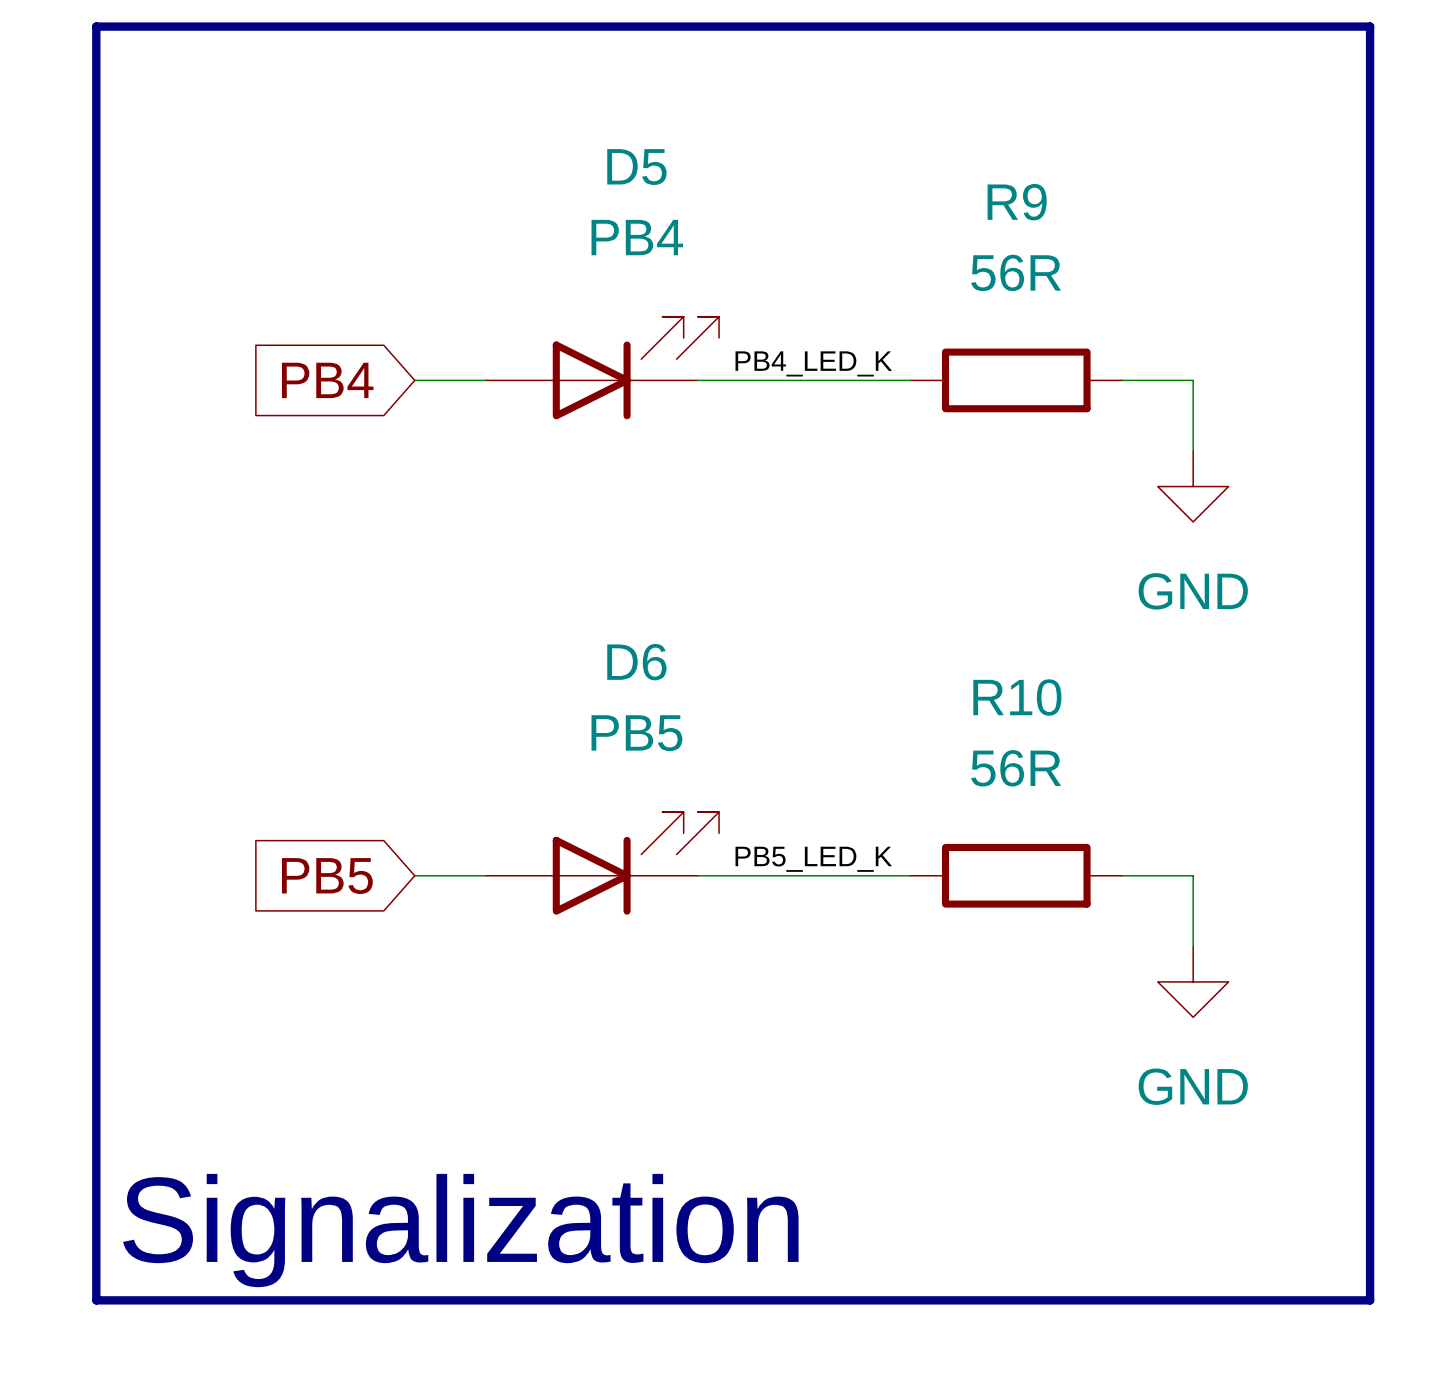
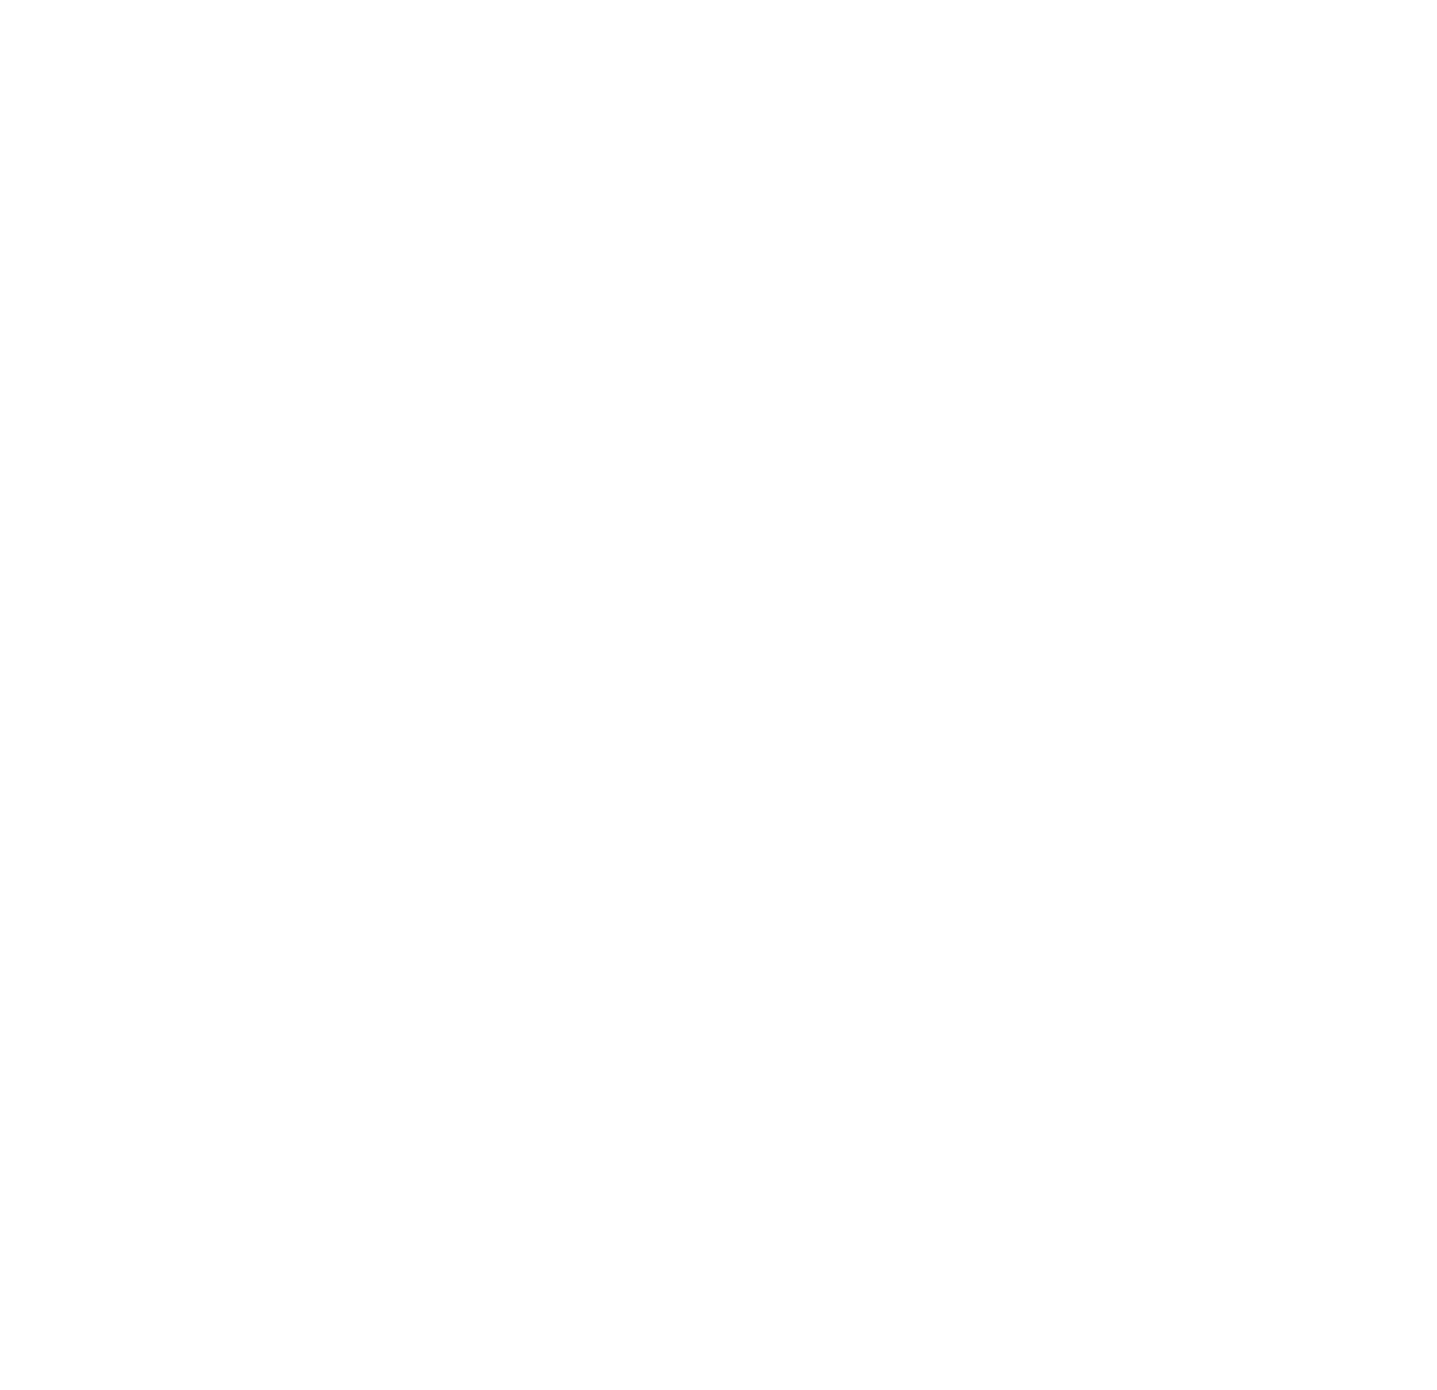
line: (96, 26) (1370, 26) (1370, 1300) (96, 1300) (96, 26) -> none
label: PB4_LED_K (813, 363) -> none
D5: PB4 (602, 368) -> none
global label: PB4 (327, 380) -> none
wire: (414, 380) (485, 380) -> none
wire: (697, 380) (910, 380) -> none
R9: 56R (1016, 380) -> none
wire: (1122, 380) (1193, 380) (1193, 451) -> none
power symbol: GND (1193, 486) -> none
label: PB5_LED_K (813, 859) -> none
D6: PB5 (602, 863) -> none
wire: (414, 875) (485, 875) -> none
wire: (697, 875) (910, 875) -> none
R10: 56R (1016, 875) -> none
wire: (1122, 875) (1193, 875) (1193, 946) -> none
global label: PB5 (327, 876) -> none
power symbol: GND (1193, 981) -> none
text: Signalization (460, 1230) -> none

